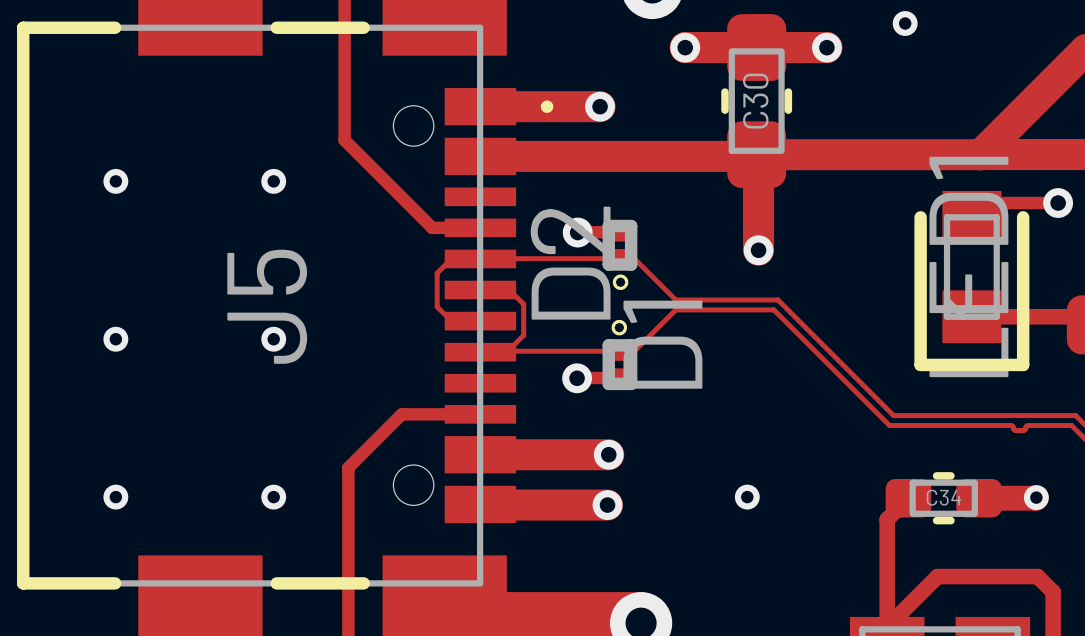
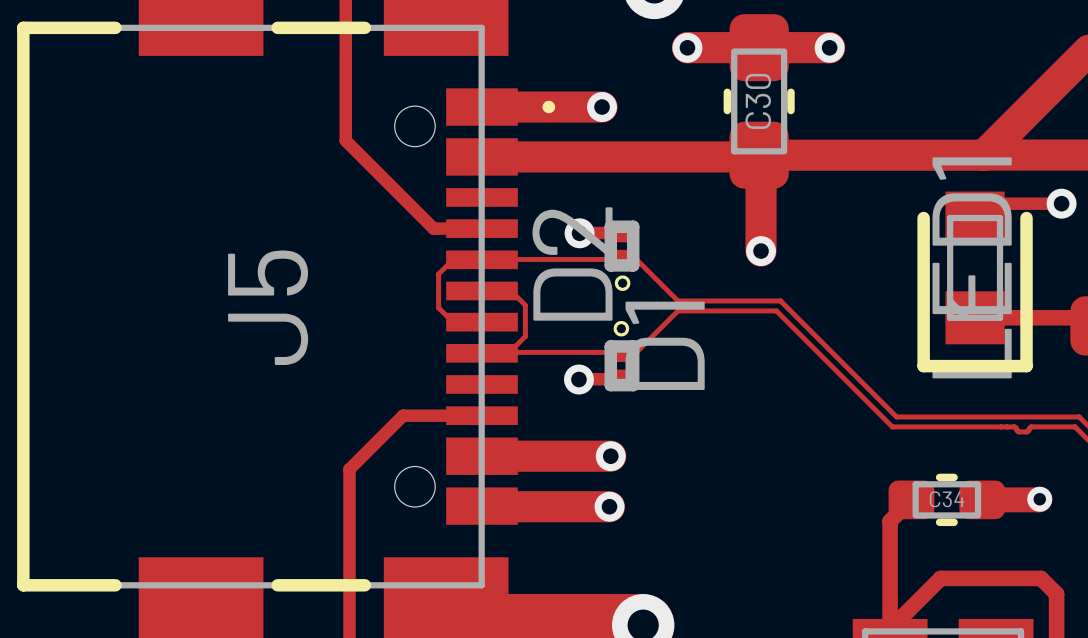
via: (905, 23) -> none
via: (115, 181) -> none
via: (273, 181) -> none
via: (115, 339) -> none
via: (273, 339) -> none
via: (115, 497) -> none
via: (273, 497) -> none
via: (747, 497) -> none

